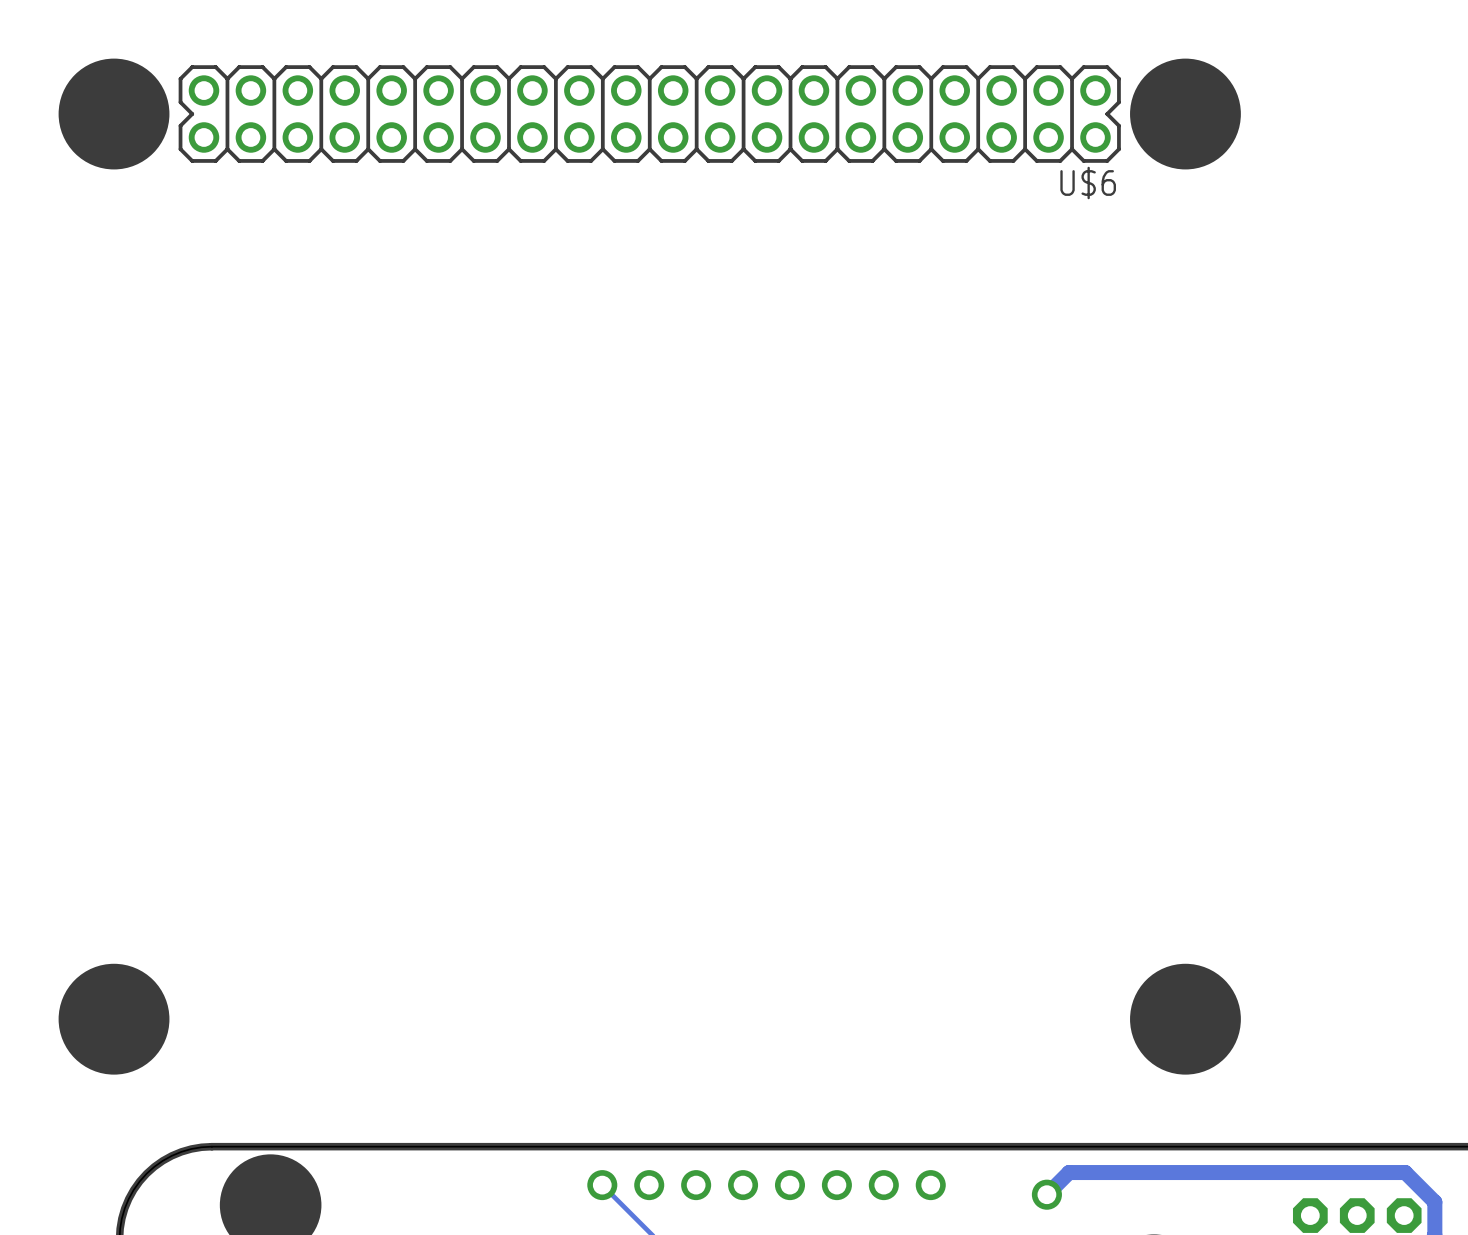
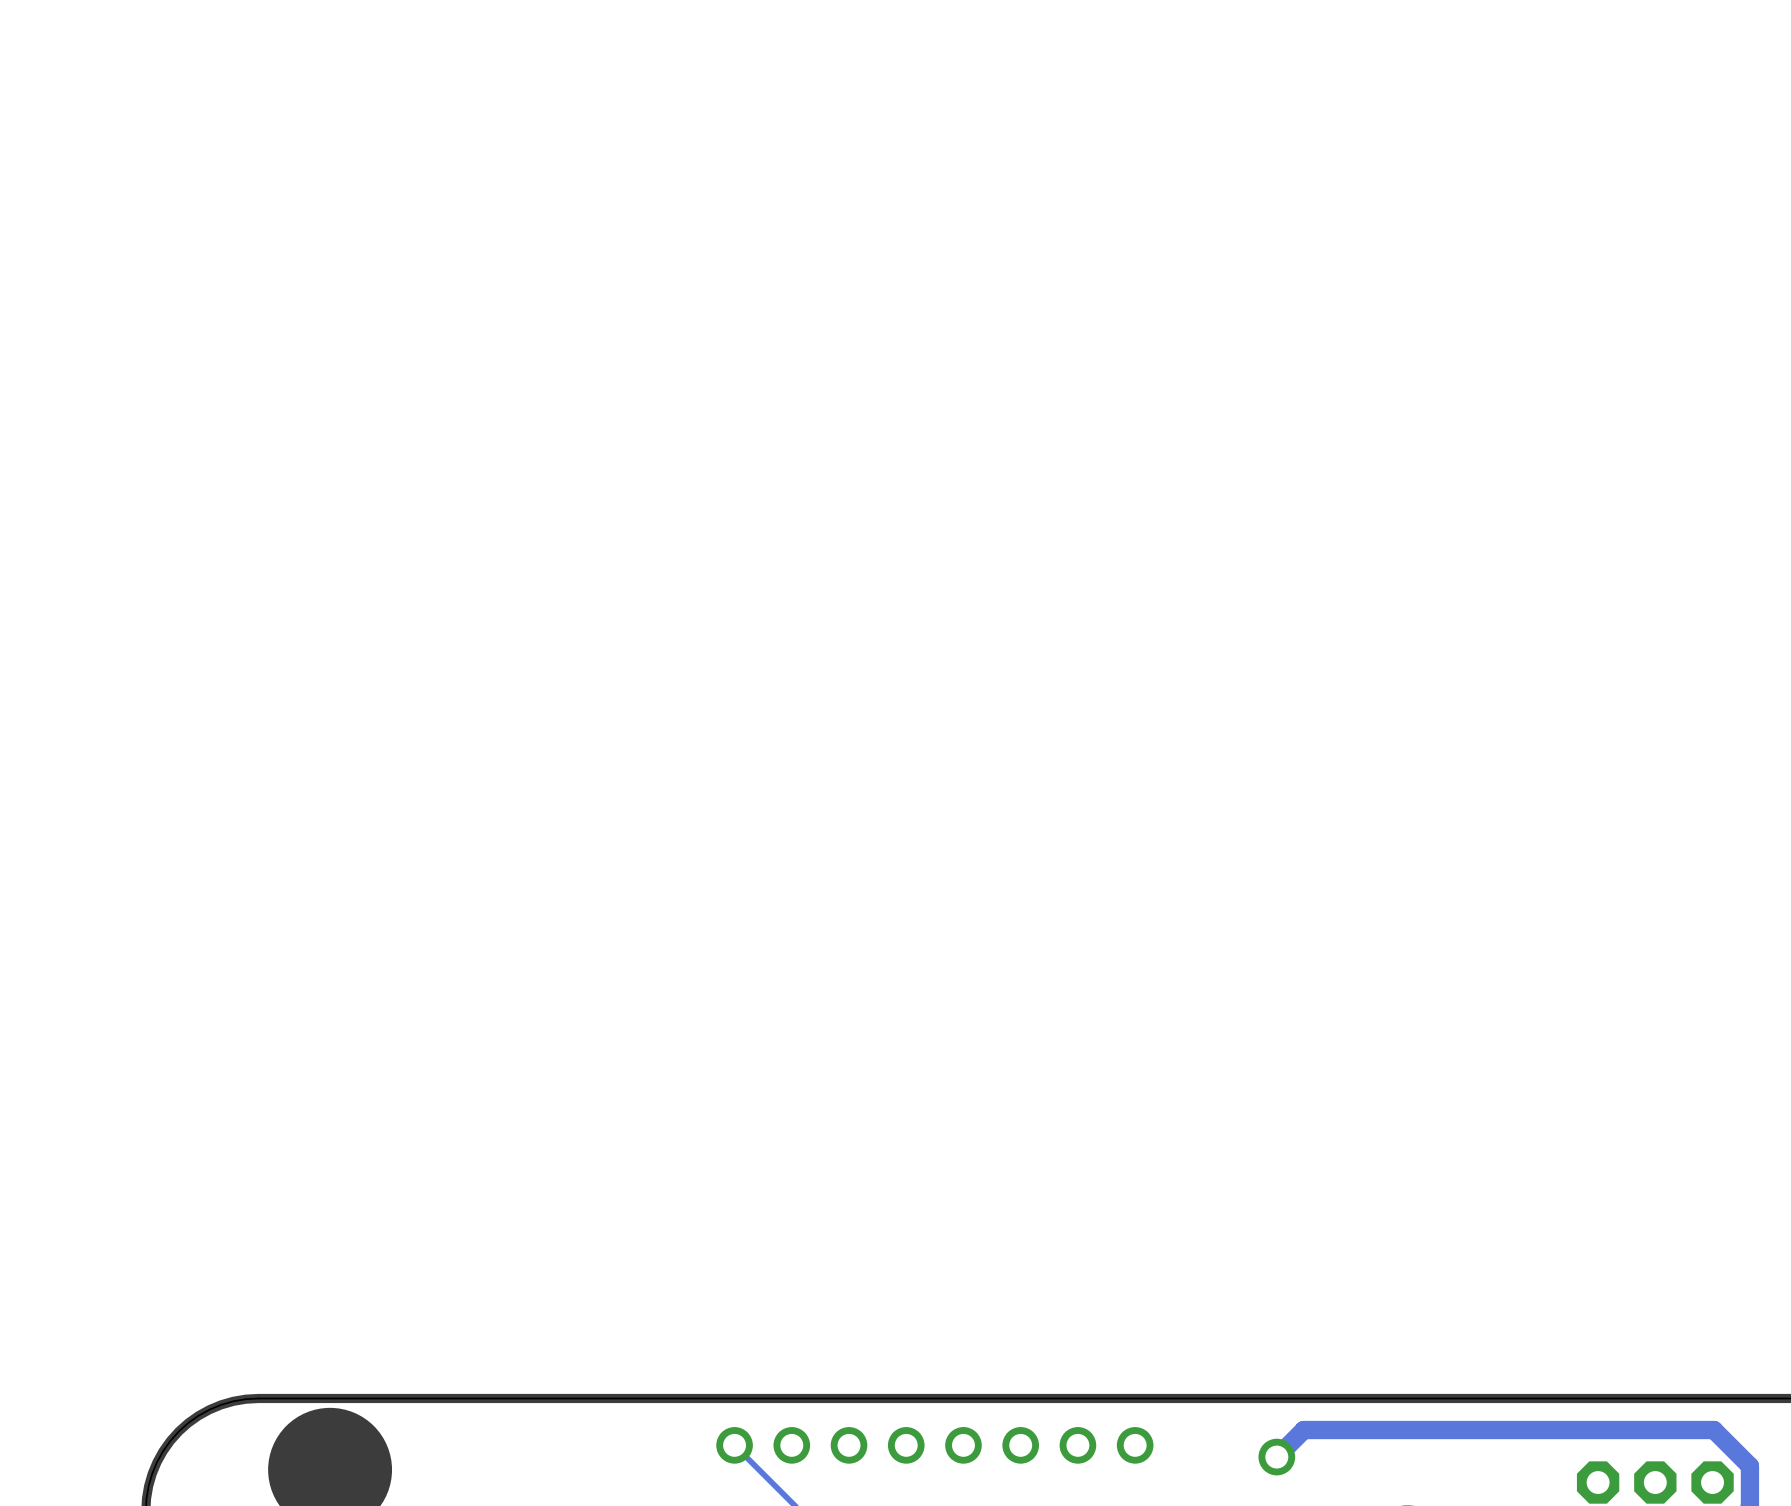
U$6: (649, 566) -> none

